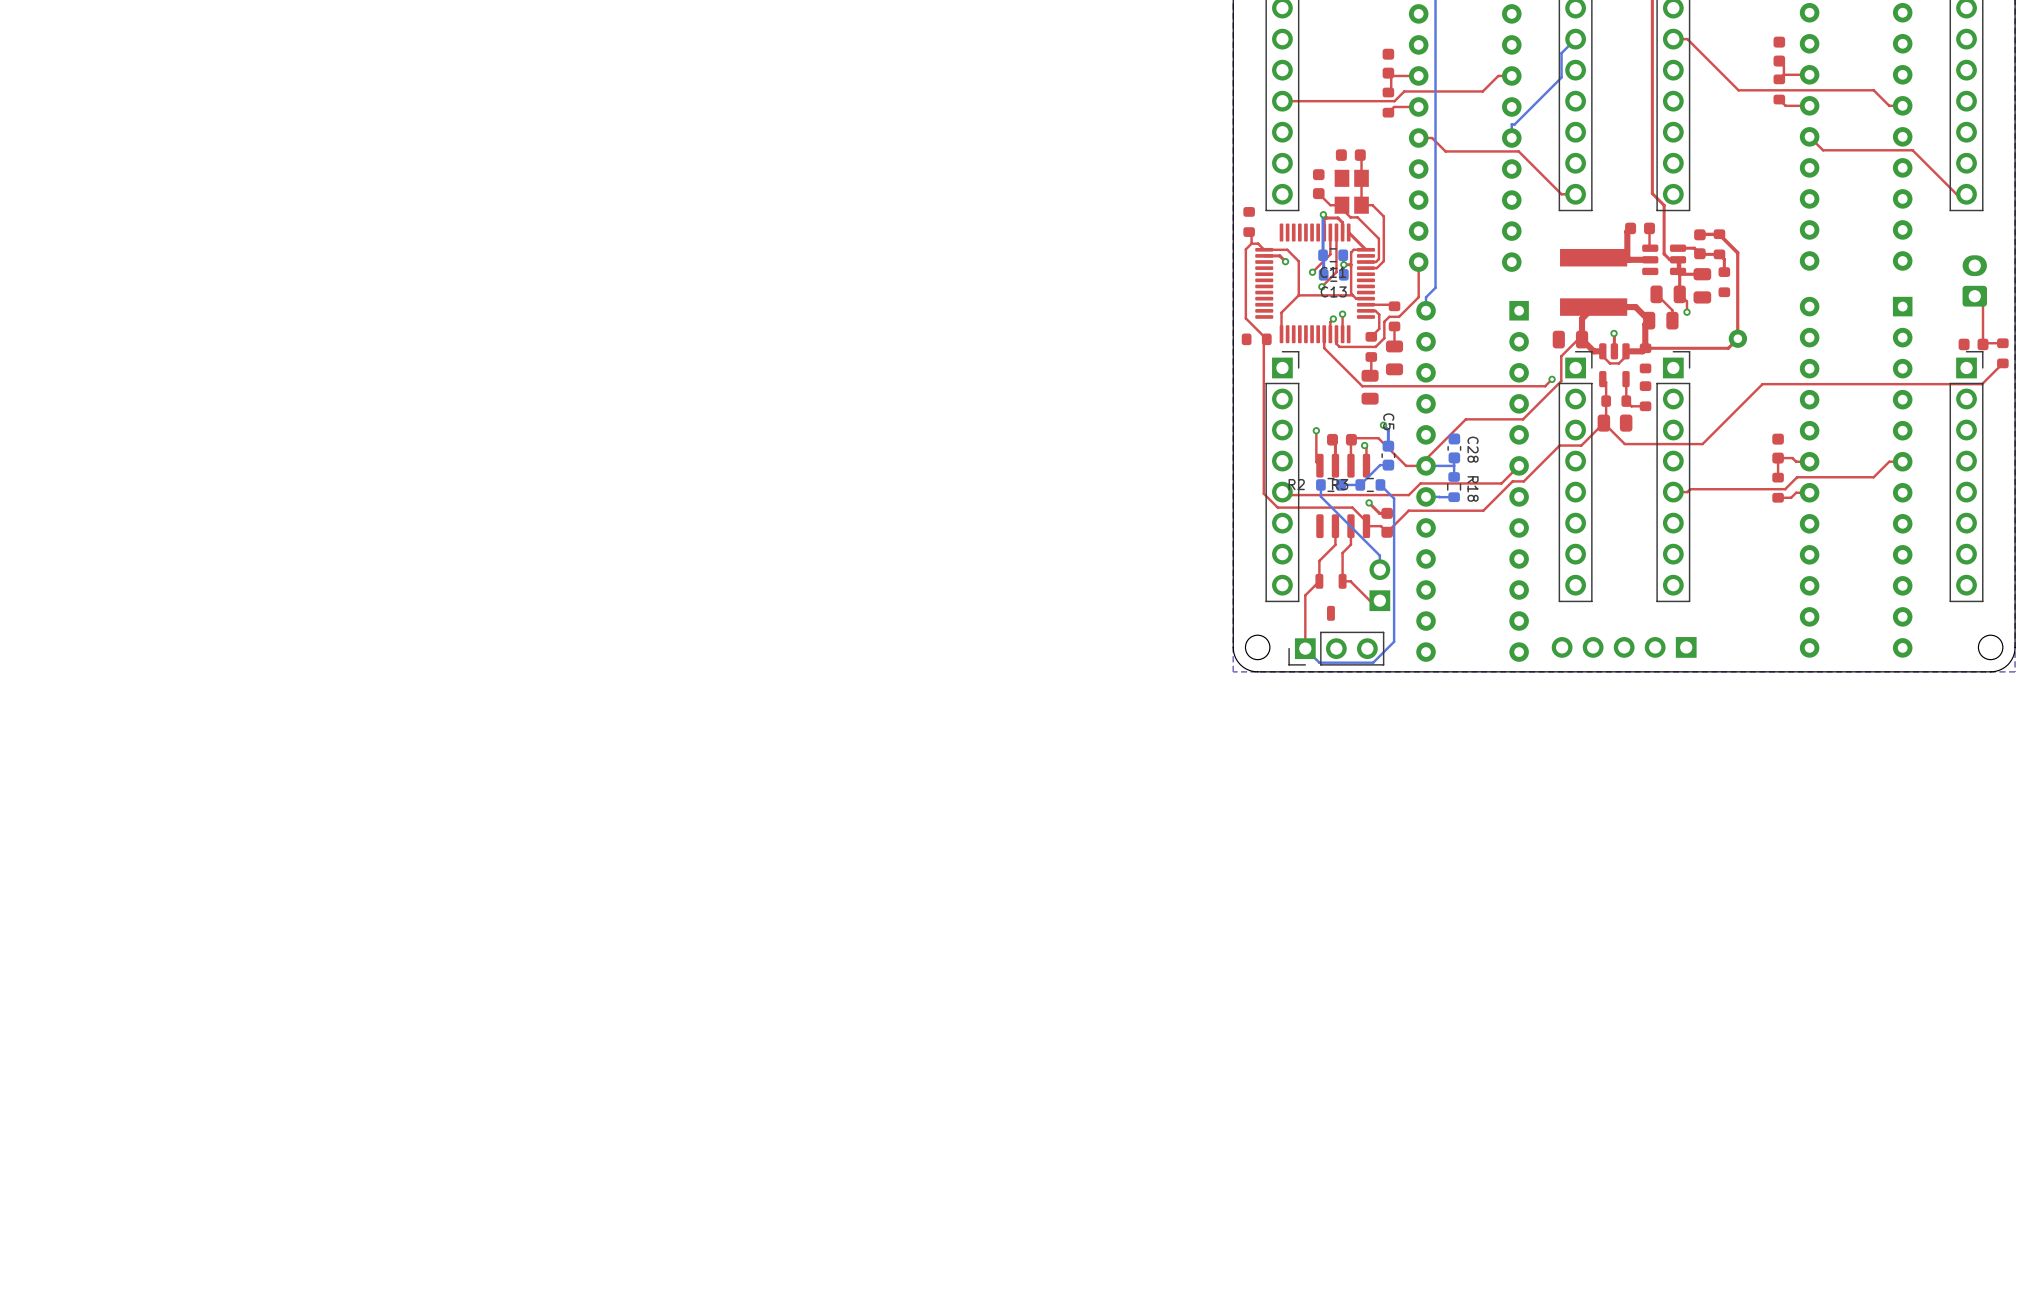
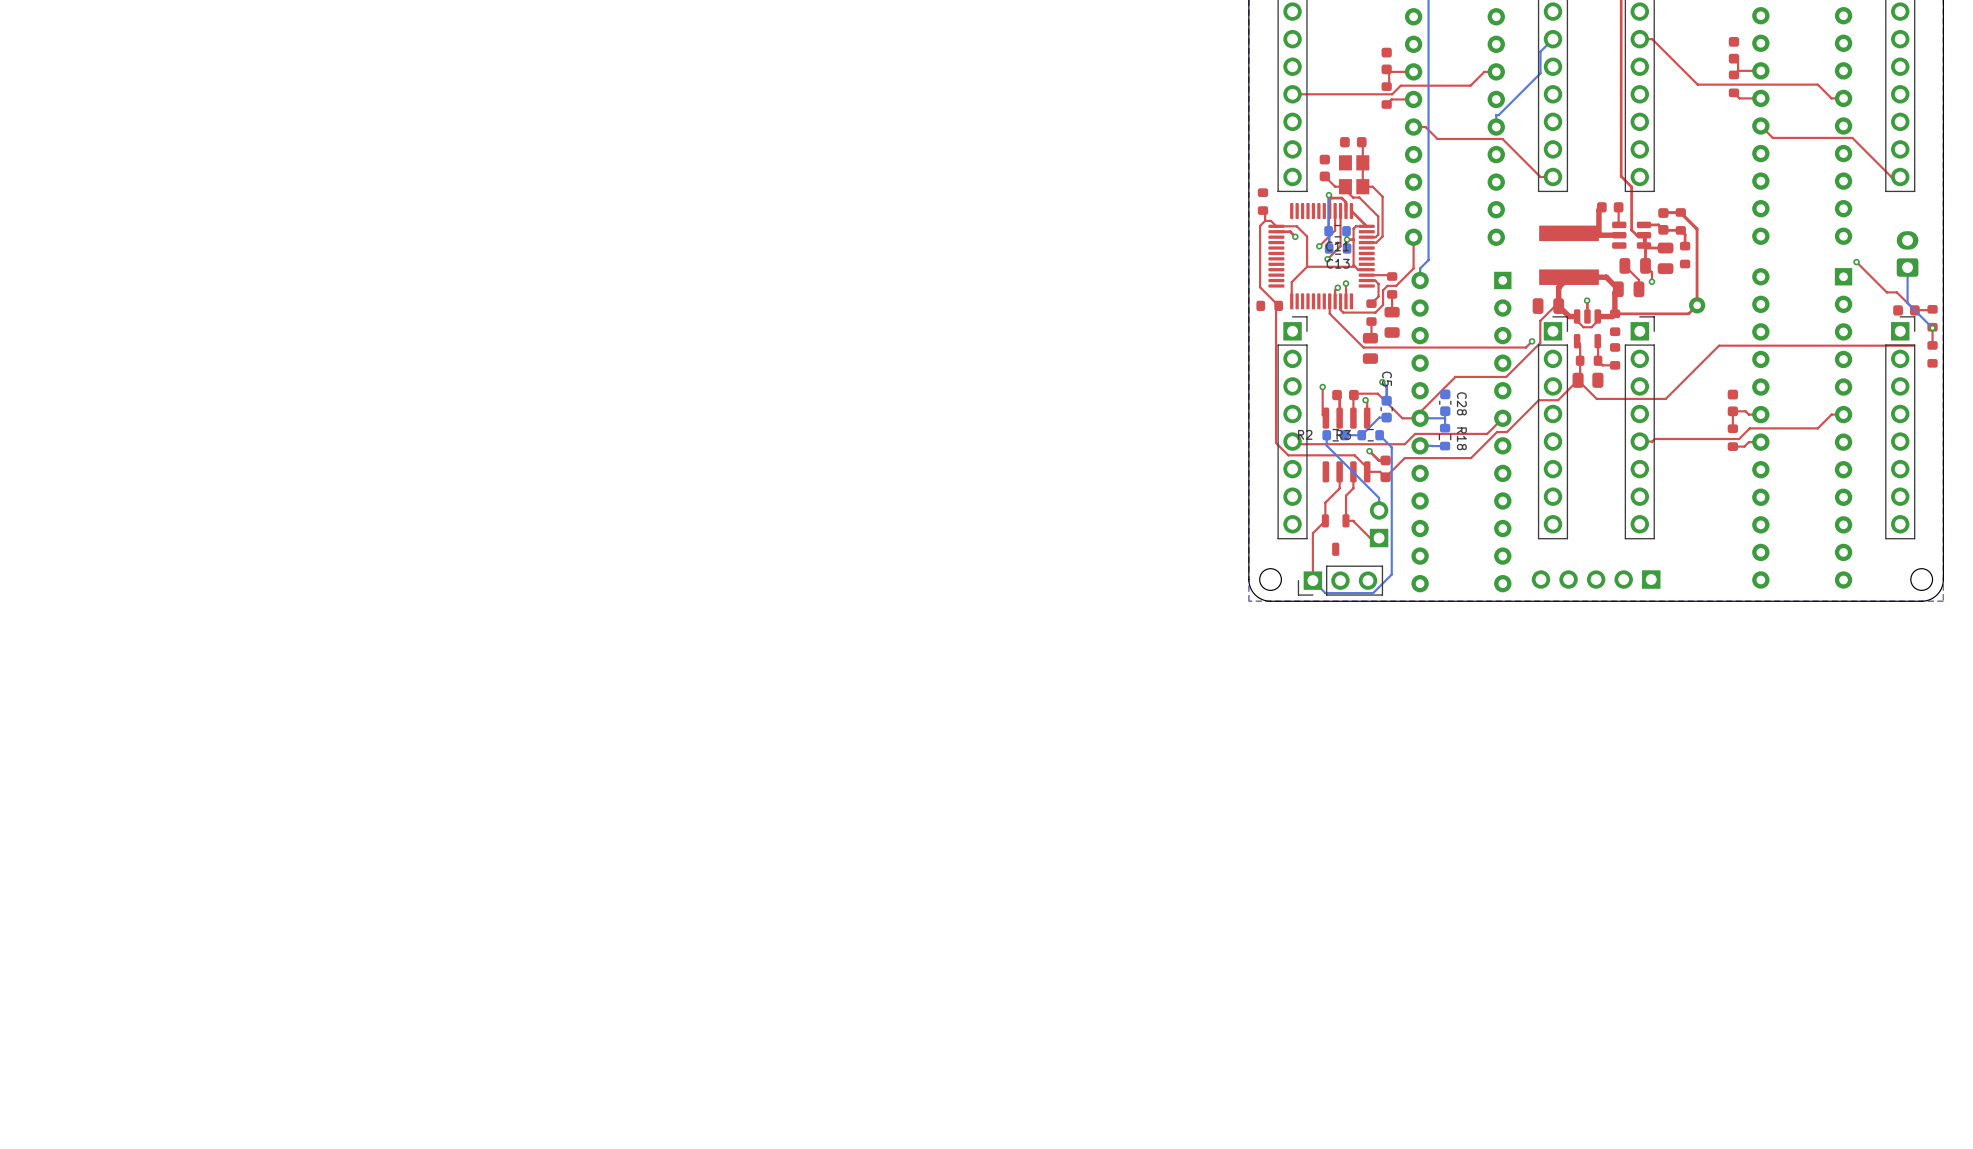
top track: none -> (1856, 262) (1886, 292) (1896, 292) (1914, 310) (1932, 310)
via: none -> (1856, 262)
bottom track: none -> (1907, 267) (1907, 303) (1932, 328)
top track: (1983, 304) (1983, 343) (2002, 343) -> none
top track: (2002, 363) (1982, 384) -> none
top track: none -> (1932, 328) (1932, 345)
via: none -> (1932, 328)
part: none -> (1932, 354)

